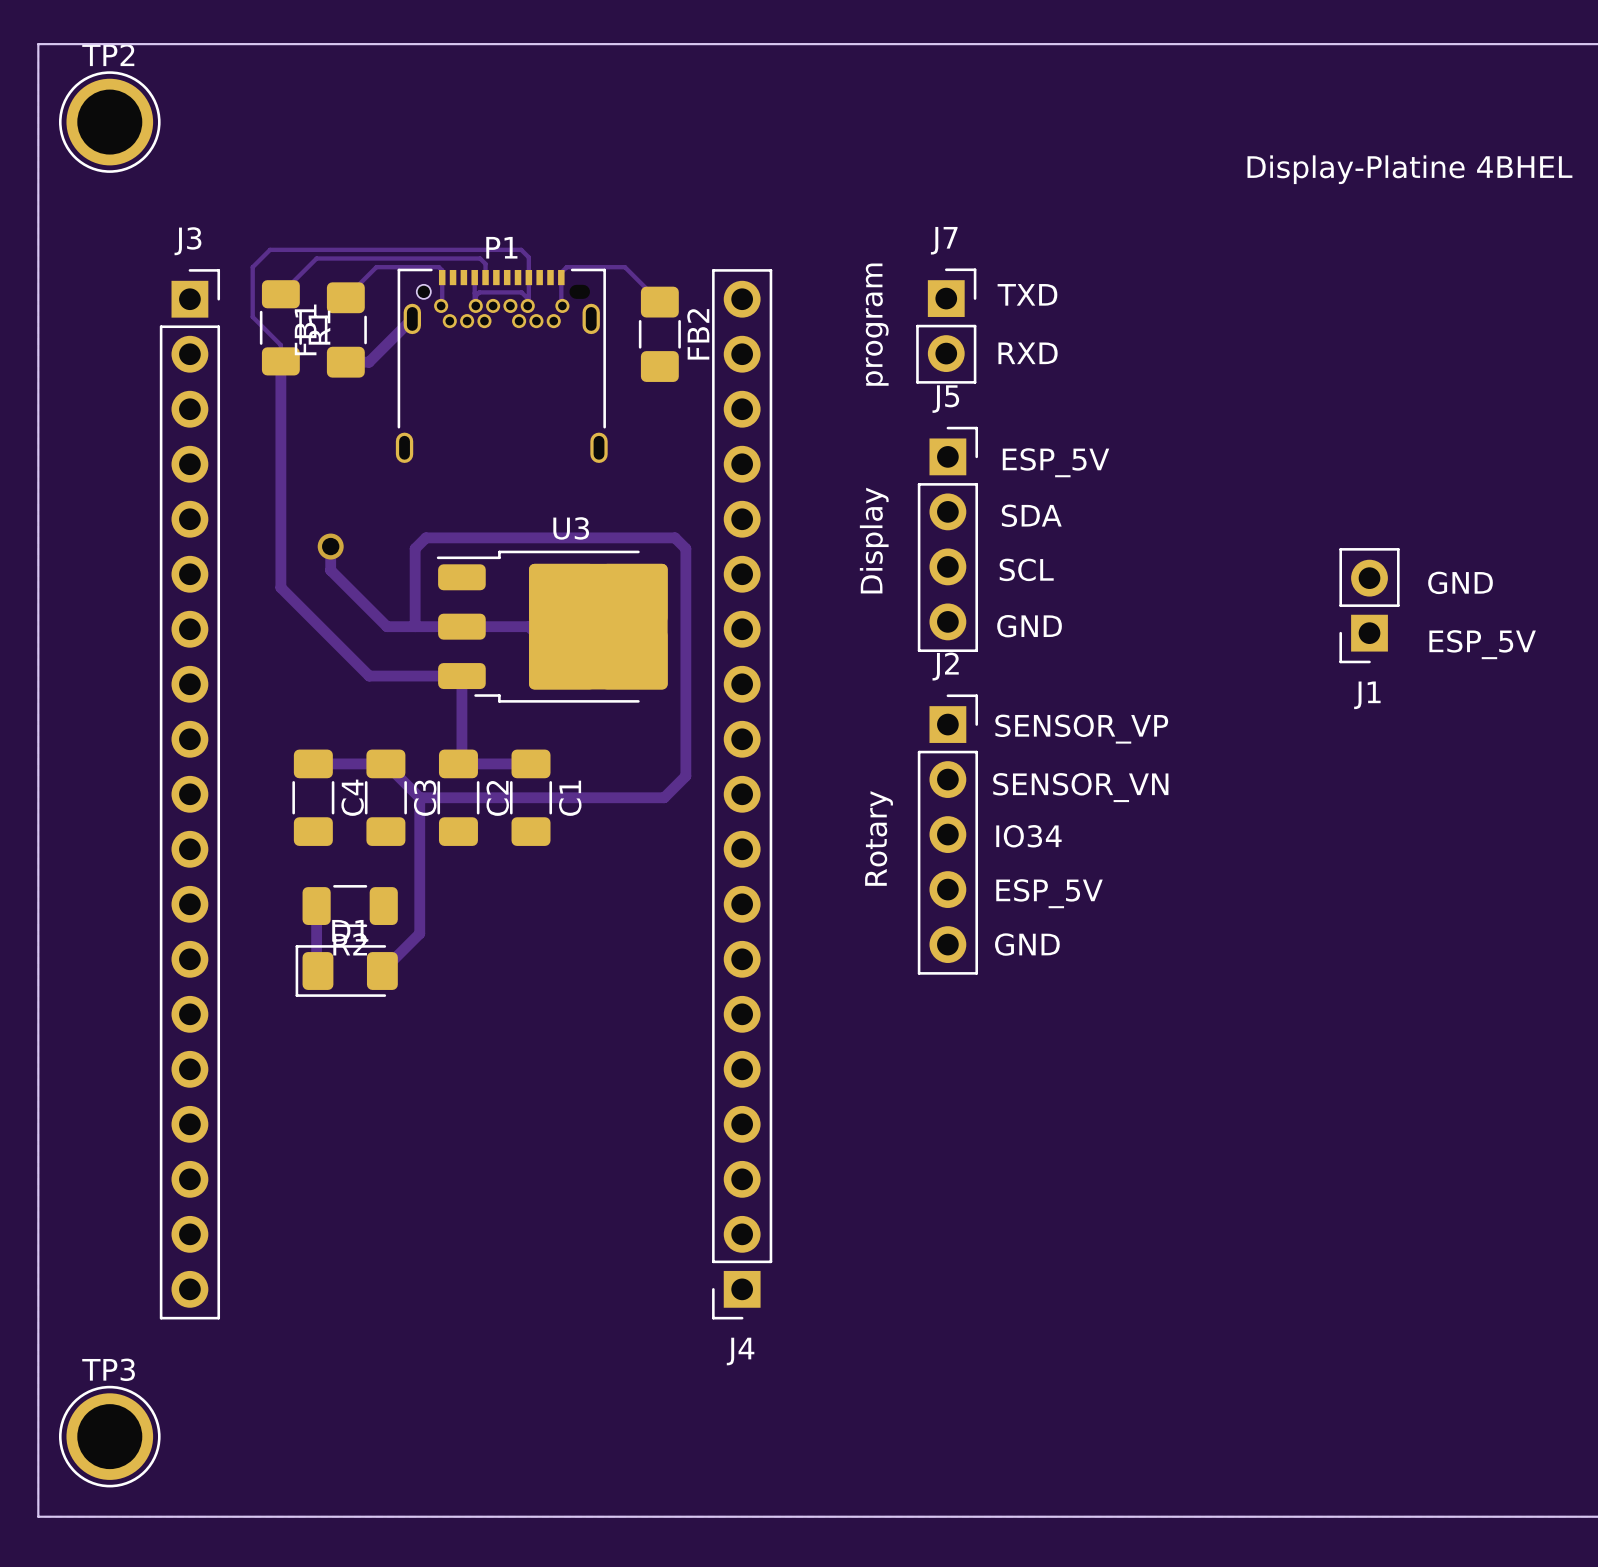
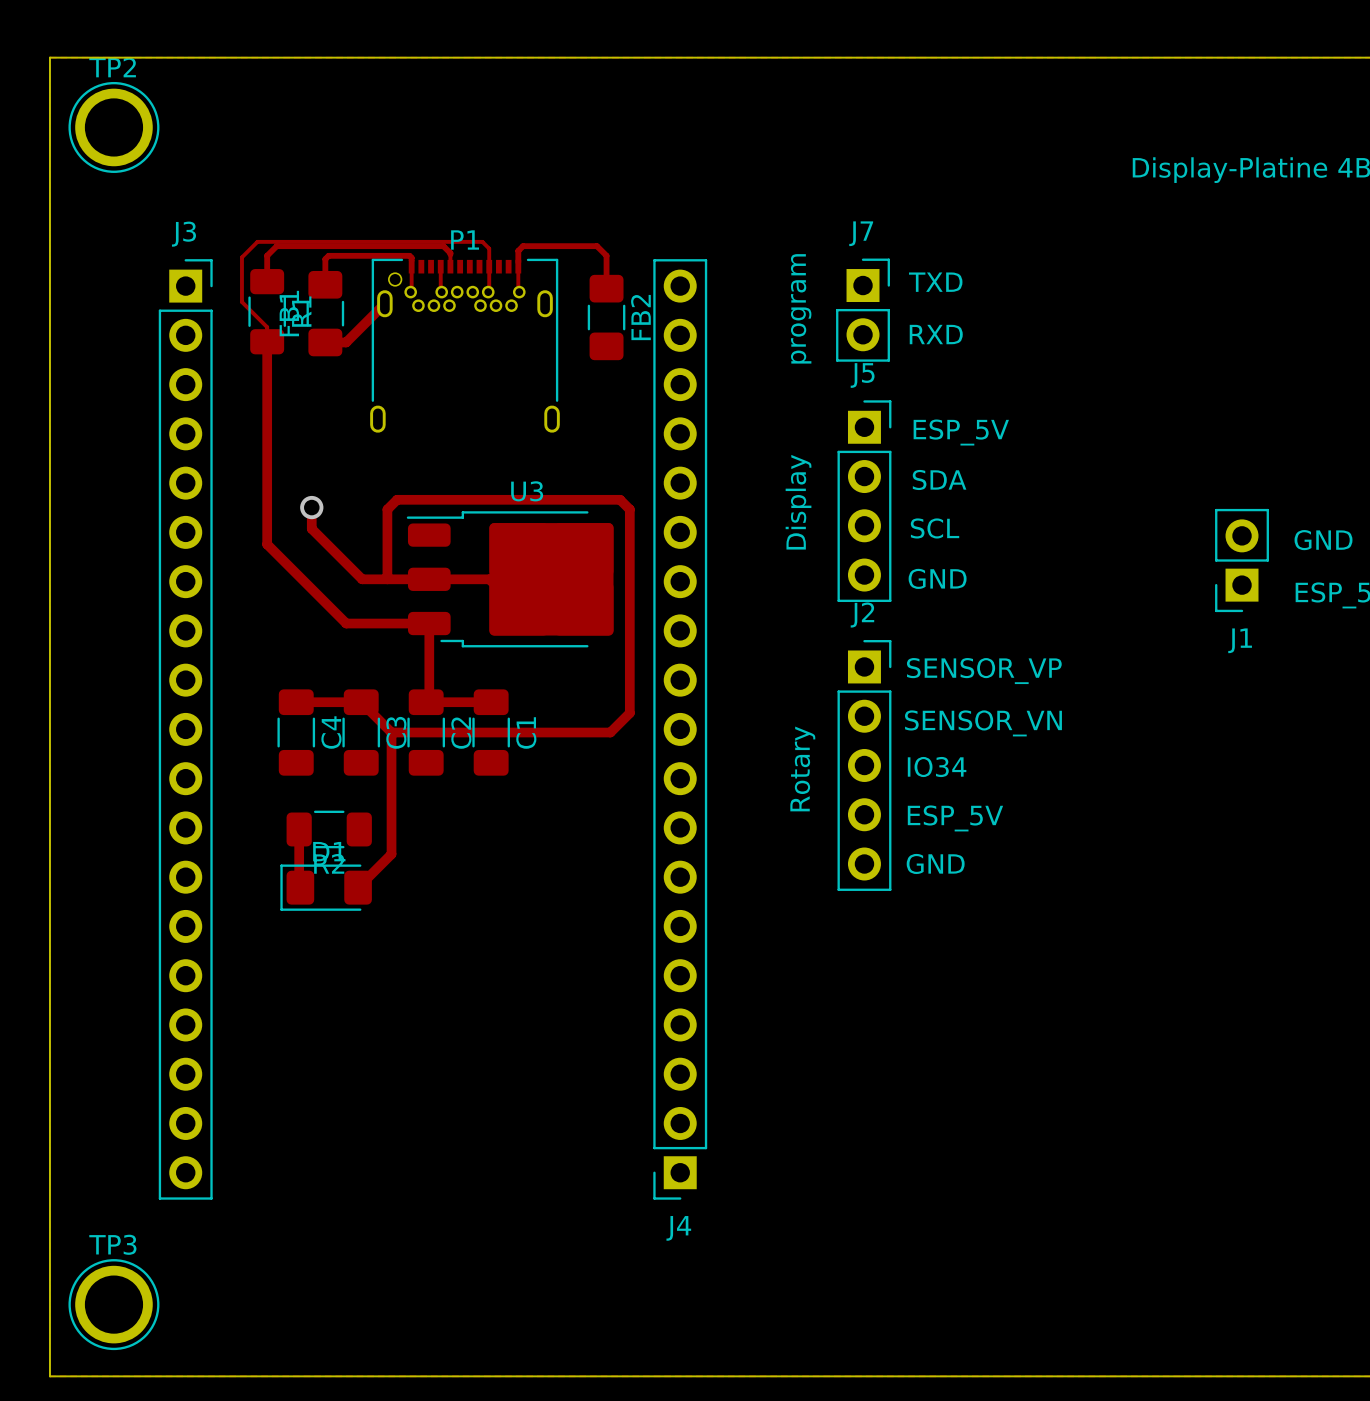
track: (485, 263) (480, 258) (316, 258) (280, 294) -> (450, 254) (443, 246) (276, 246) (267, 255) (267, 281)
track: (442, 270) (438, 267) (376, 267) (345, 297) -> (411, 260) (409, 255) (328, 255) (325, 259) (325, 284)
track: (561, 272) (566, 267) (624, 267) (659, 302) -> (518, 262) (518, 250) (523, 246) (596, 246) (606, 255) (606, 288)
track: (475, 305) (475, 295) (479, 292) (521, 292) (527, 298) (527, 305) -> none

